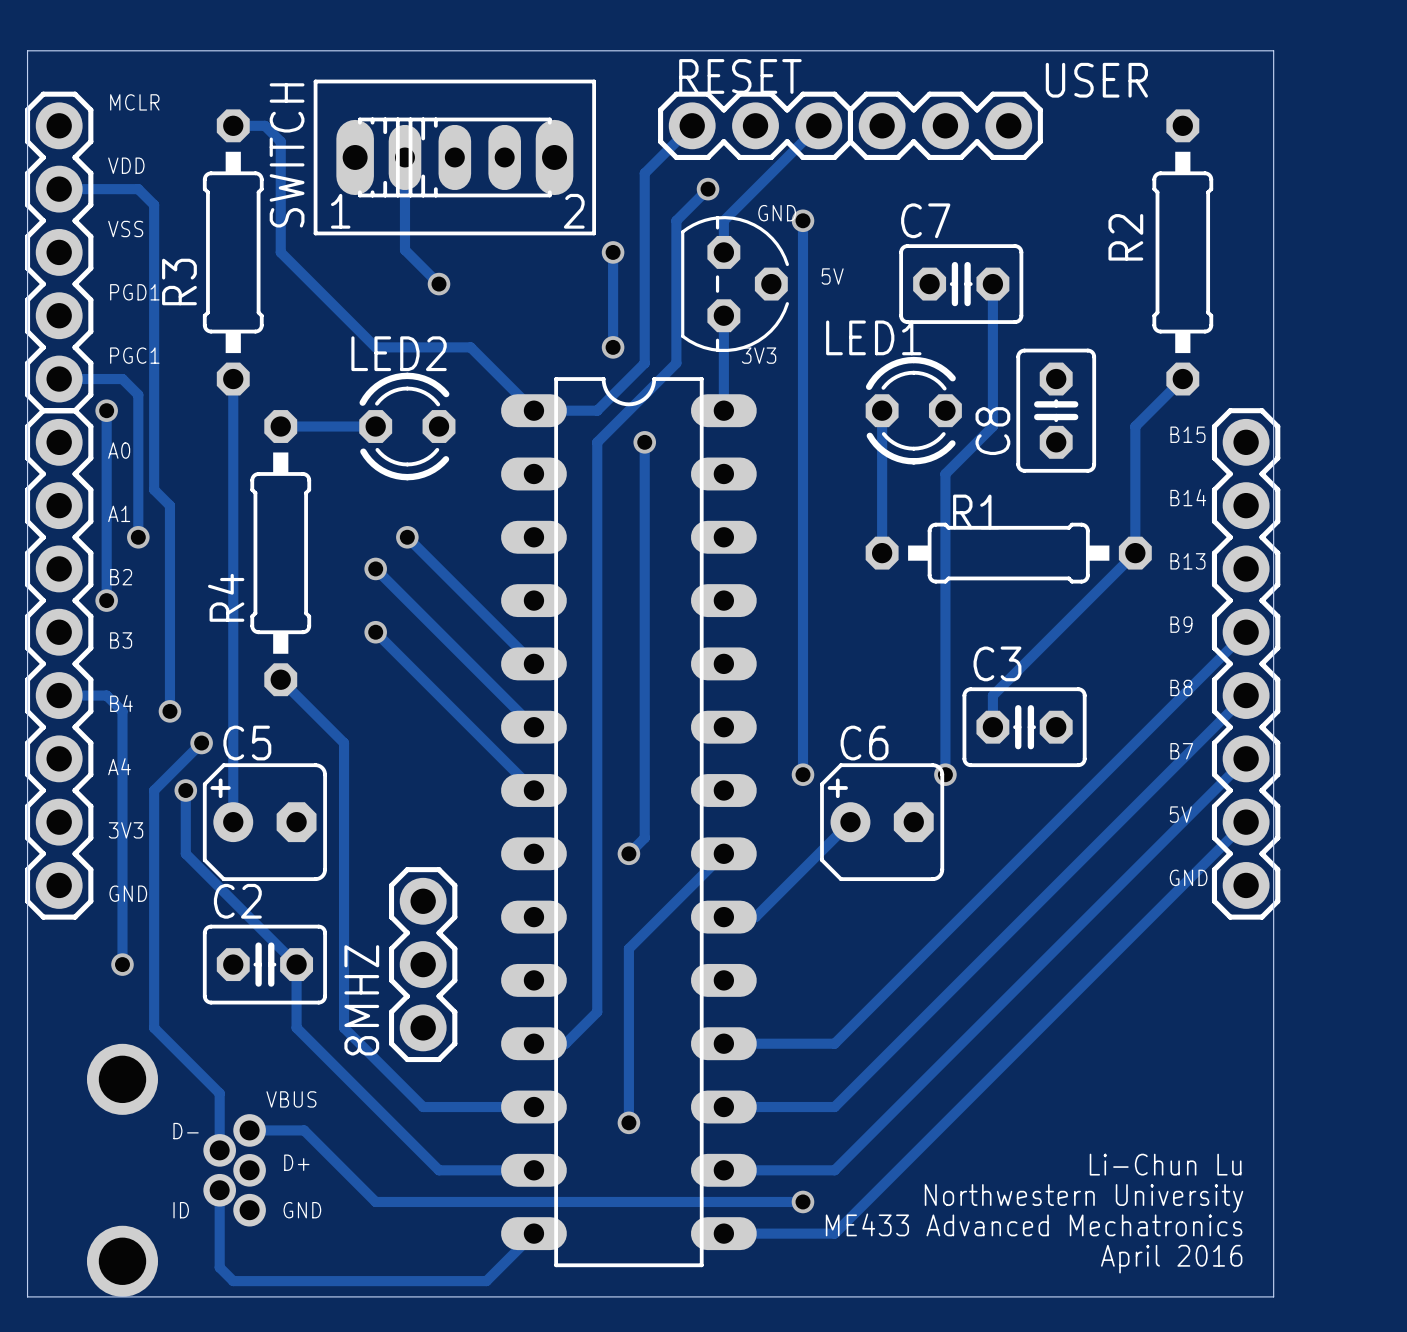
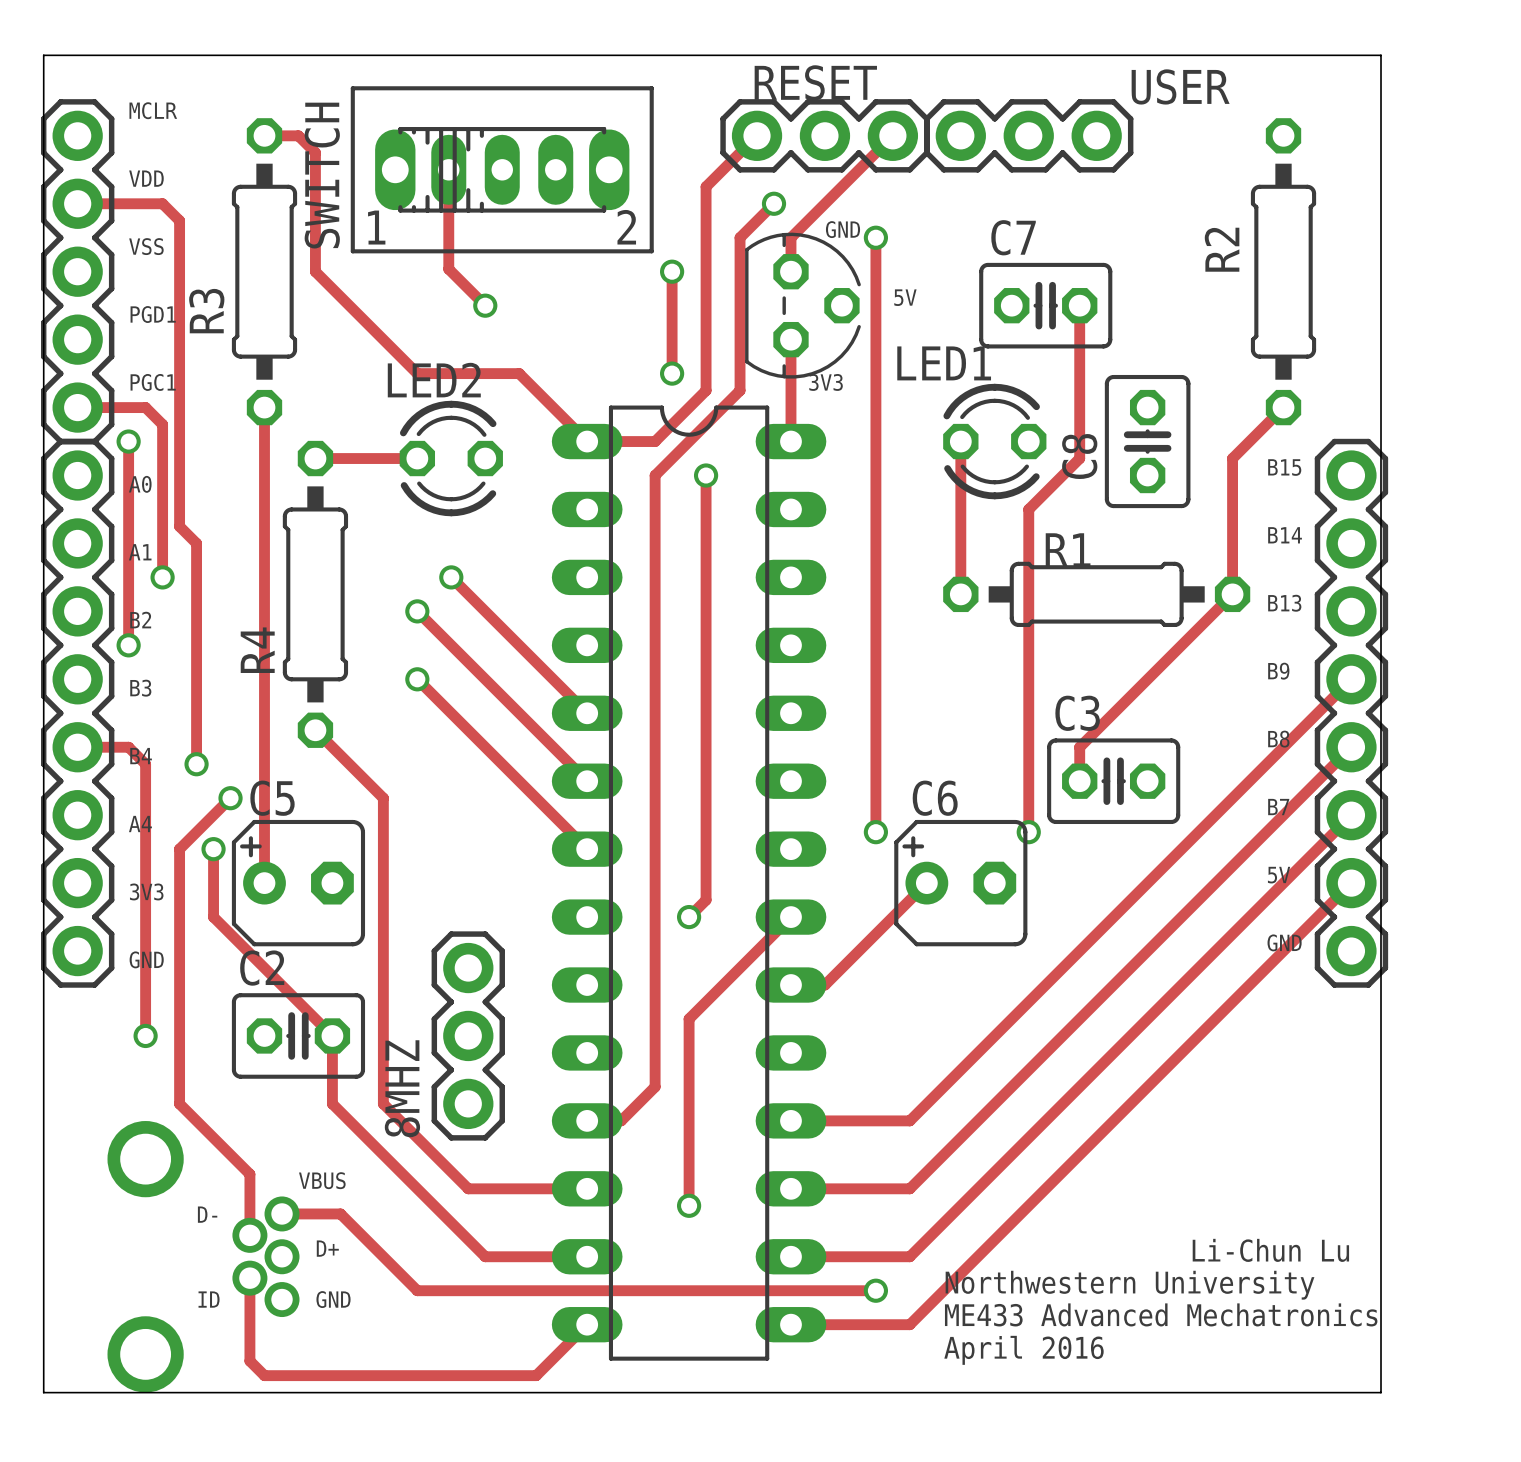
text position: Northwestern University (1084, 1198) -> Northwestern University (1130, 1285)
text position: ME433 Advanced Mechatronics (1034, 1224) -> ME433 Advanced Mechatronics (1161, 1314)
text position: April 2016 (1171, 1259) -> April 2016 (1023, 1350)

